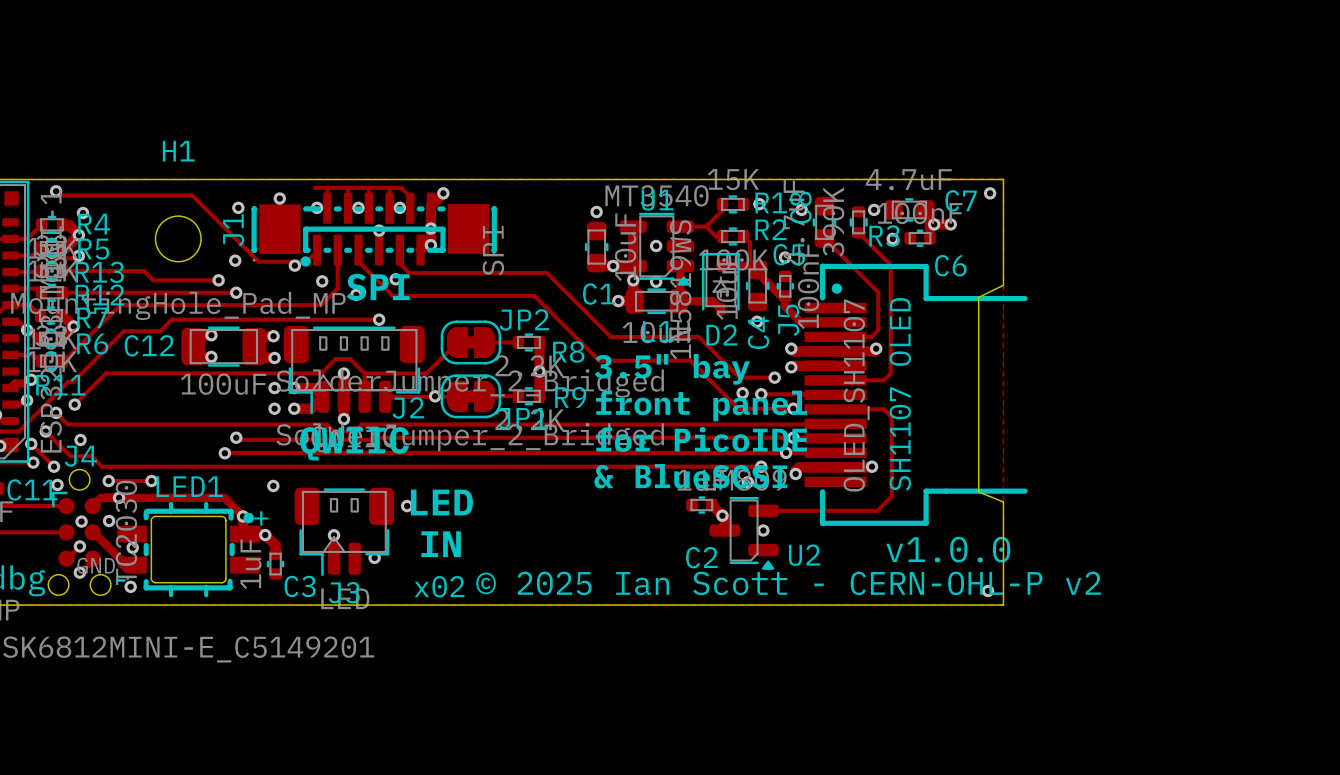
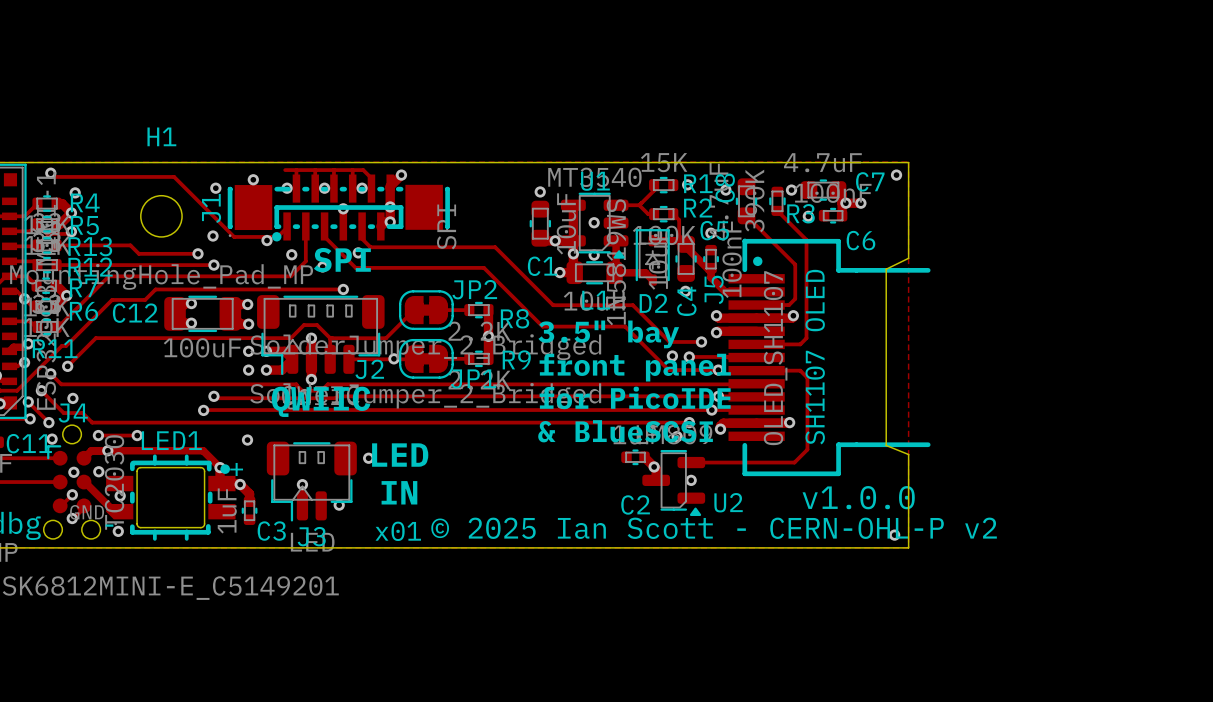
text: x02 (439, 586) -> x01 (398, 531)

